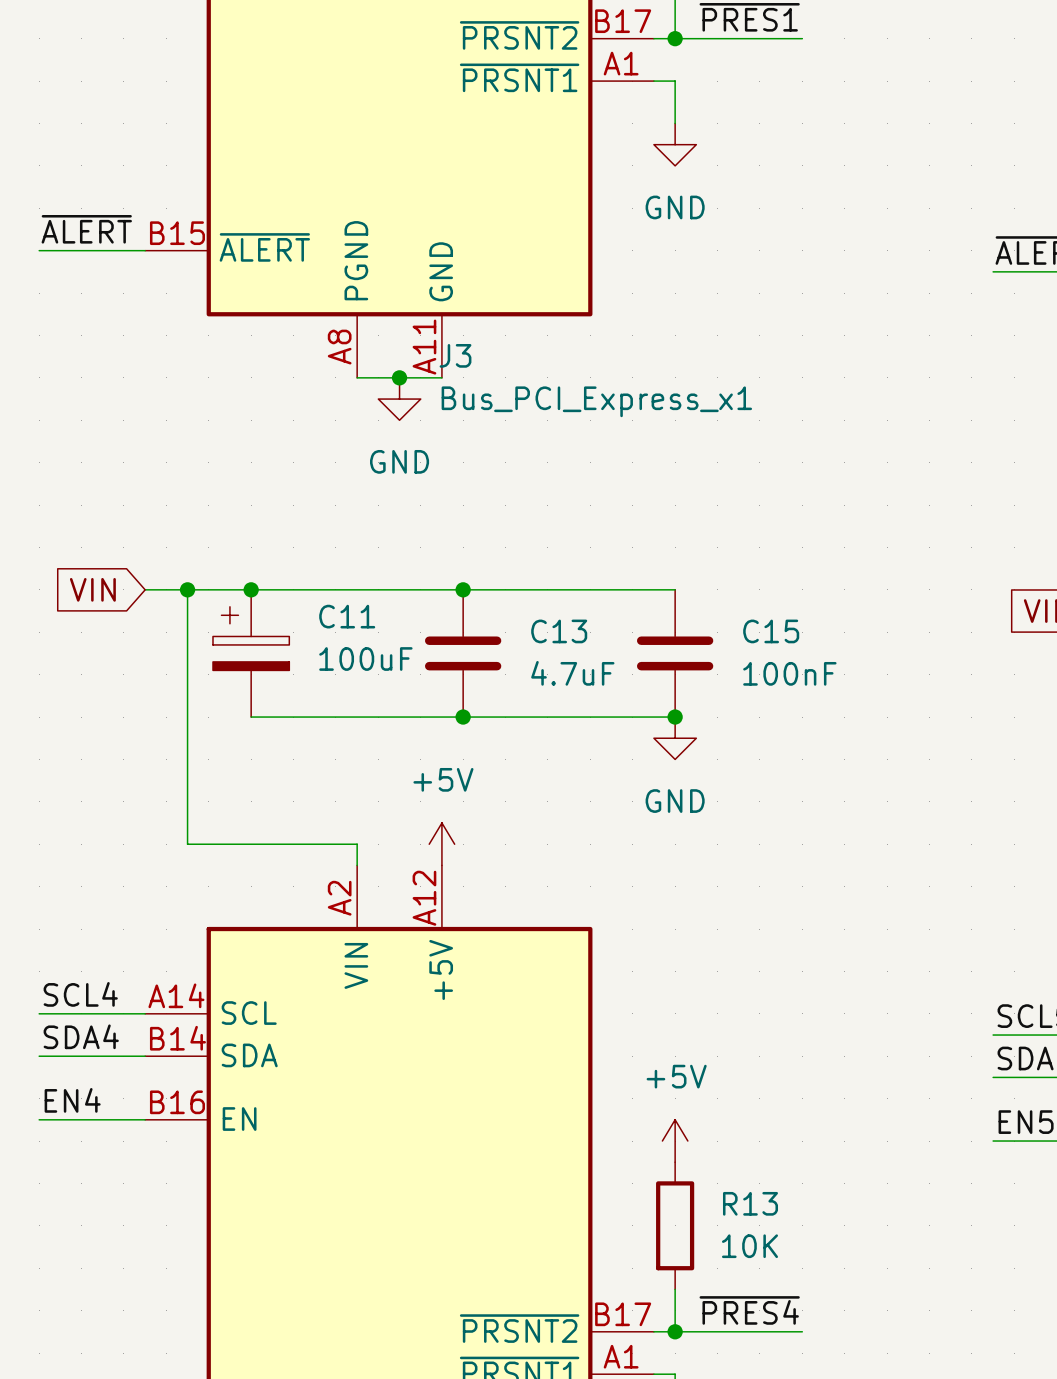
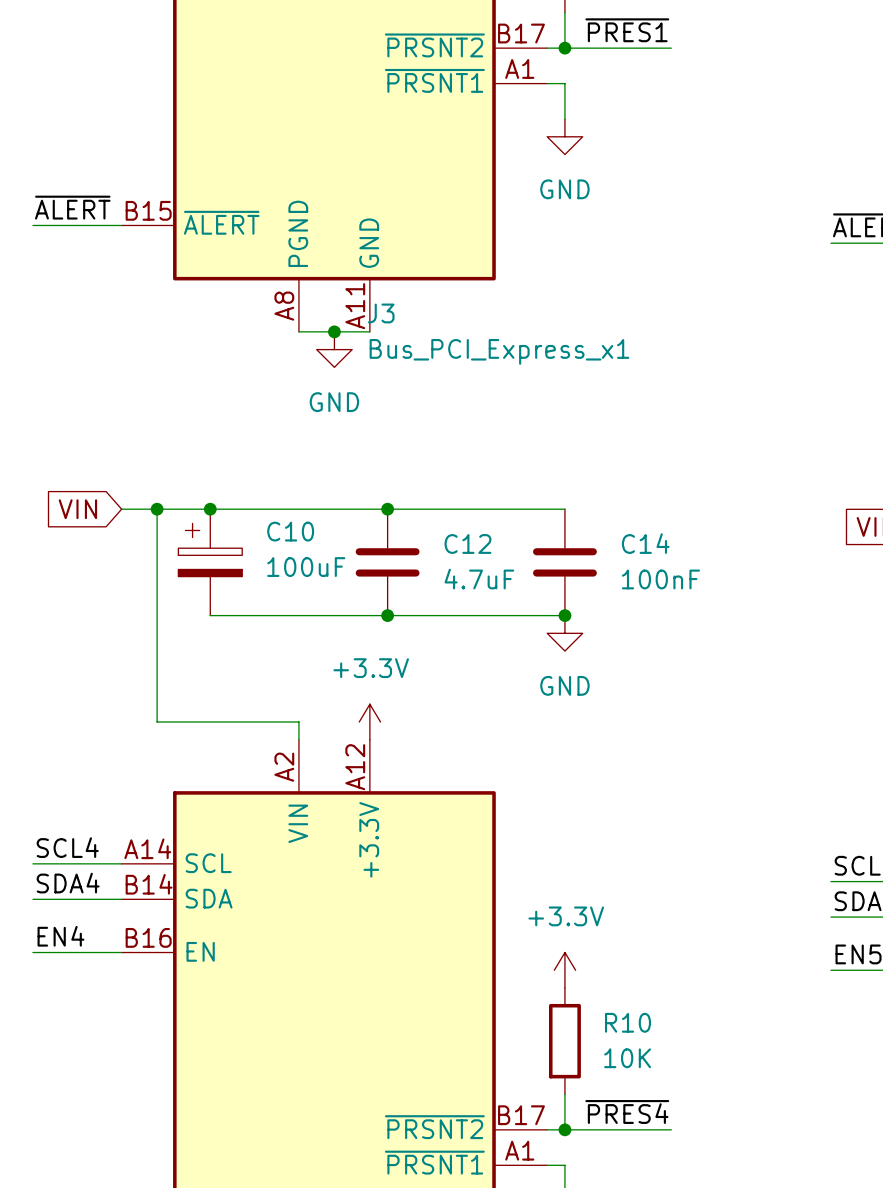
C11 name: C11 (347, 616) -> C10 (290, 531)
C13 name: C13 (559, 631) -> C12 (467, 544)
C15 name: C15 (771, 631) -> C14 (645, 543)
power symbol: +5V (441, 844) -> +3.3V (369, 721)
part pin name: +5V (441, 969) -> +3.3V (369, 839)
power symbol: +5V (675, 1141) -> +3.3V (564, 970)
R13 name: R13 (750, 1203) -> R10 (627, 1022)

